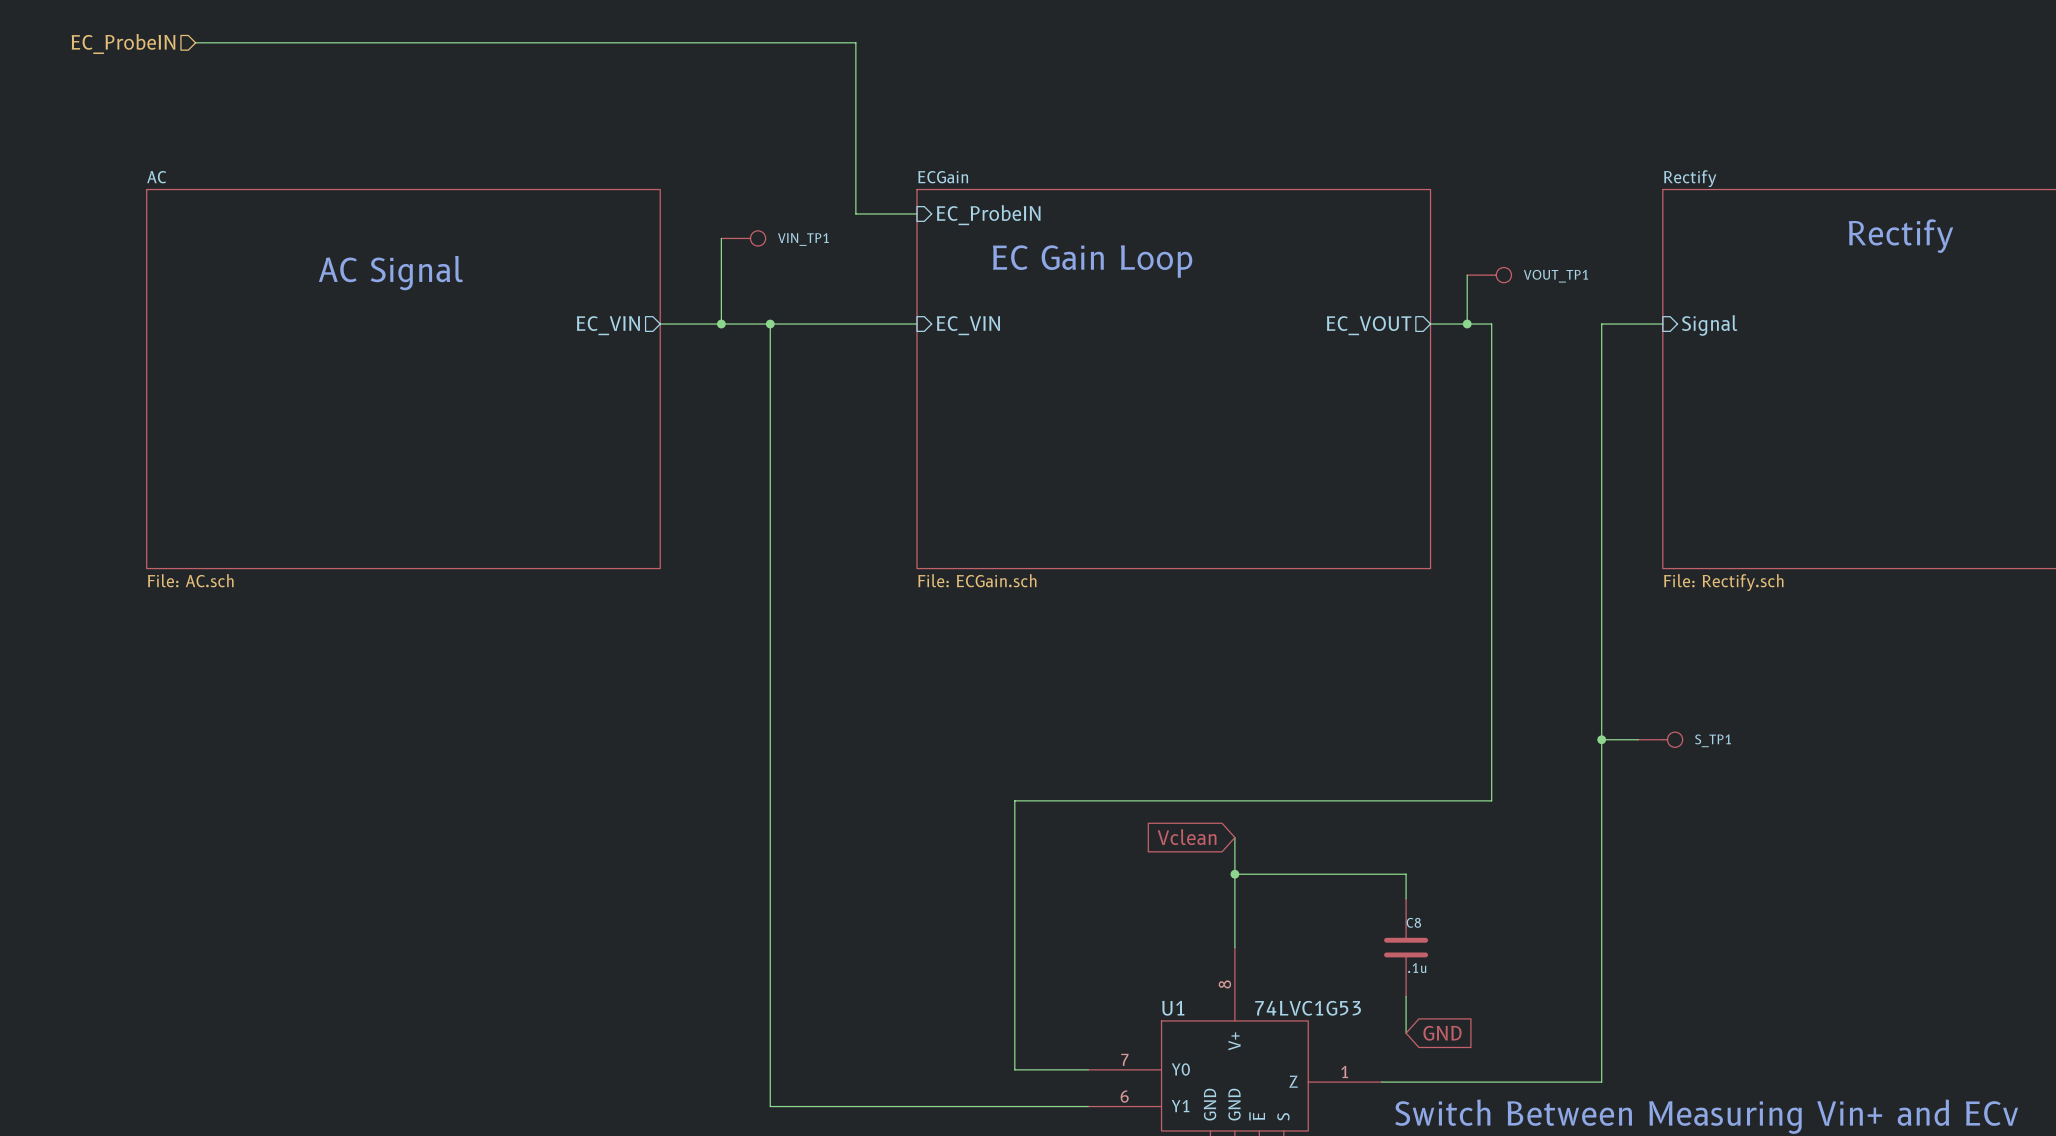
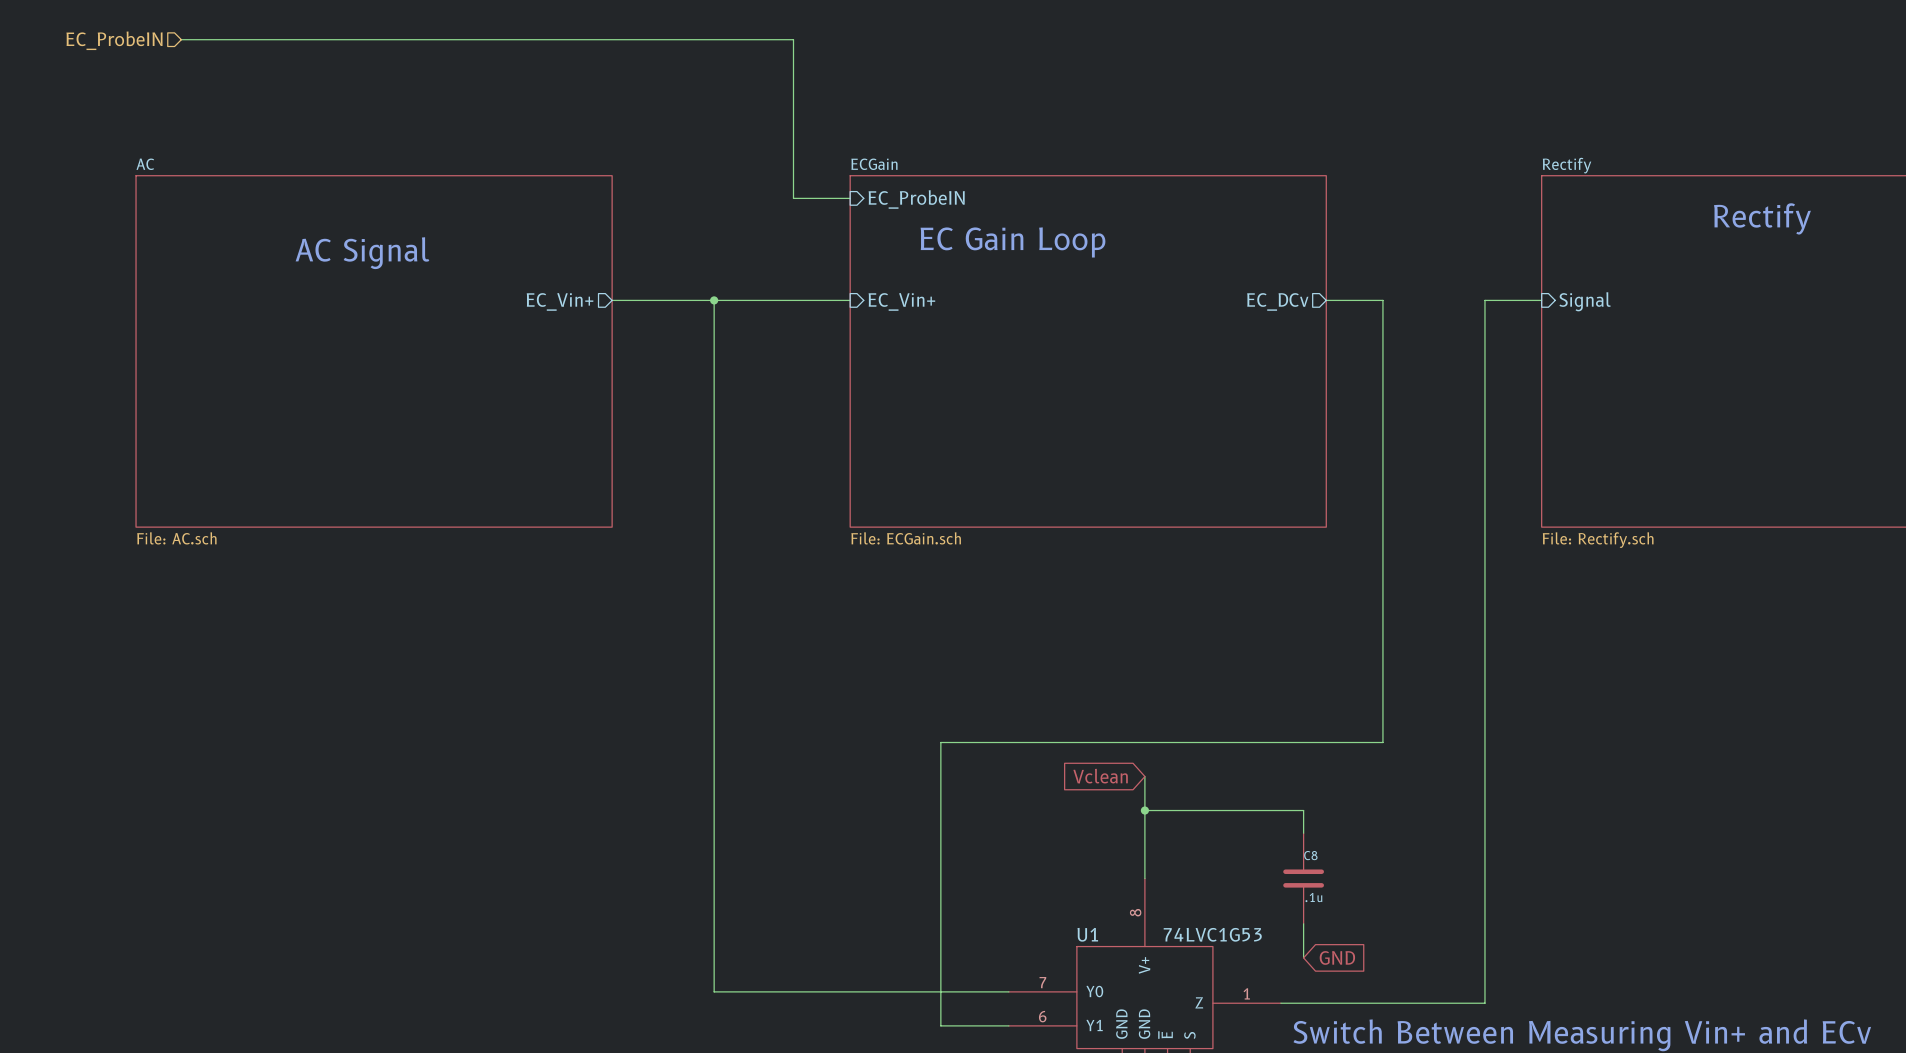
wire: (721, 238) (721, 324) -> none
VIN_TP1: (743, 238) -> none
wire: (1467, 275) (1467, 324) -> none
VOUT_TP1: (1489, 275) -> none
junction: (721, 324) -> none
junction: (1467, 324) -> none
sheet pin: EC_VIN (608, 325) -> EC_Vin+ (560, 301)
sheet pin: EC_VIN (968, 325) -> EC_Vin+ (901, 301)
sheet pin: EC_VOUT (1369, 325) -> EC_DCv (1277, 301)
wire: (1601, 739) (1638, 739) -> none
junction: (1601, 739) -> none
S_TP1: (1660, 739) -> none
wire: (770, 1069) (770, 1106) (1014, 1106) -> (714, 991) (940, 991) (940, 1025)

